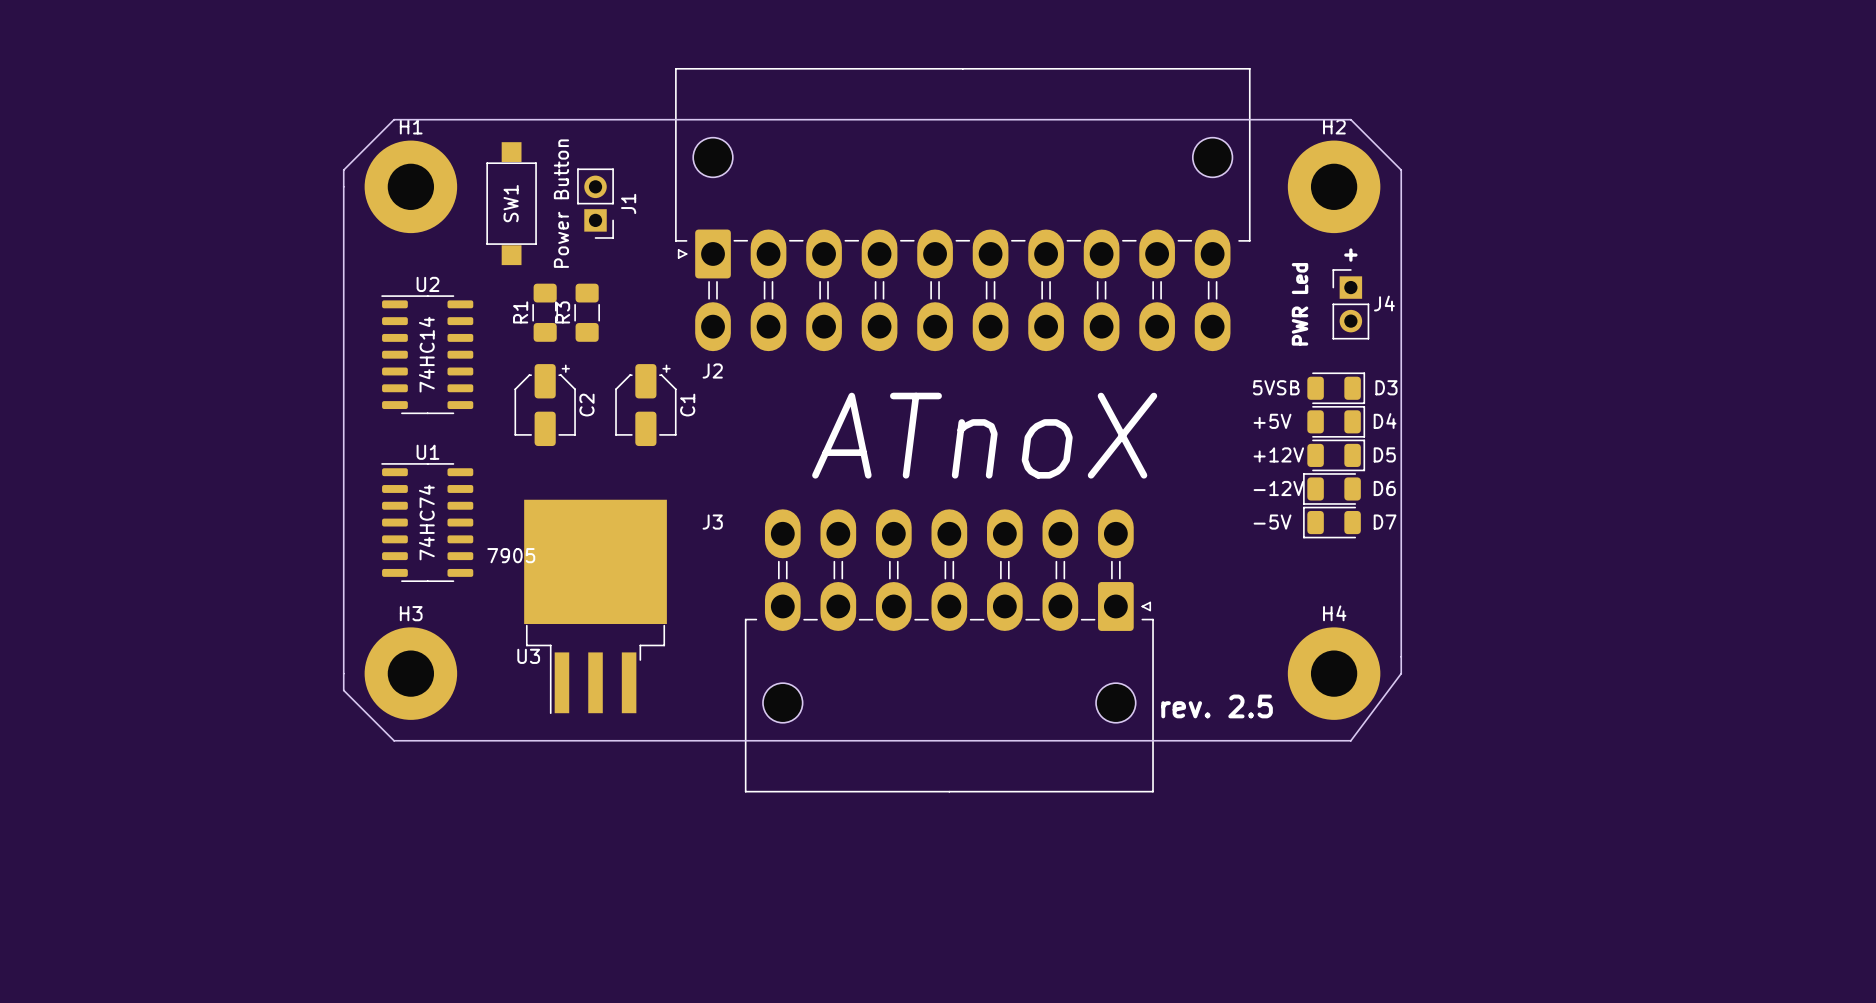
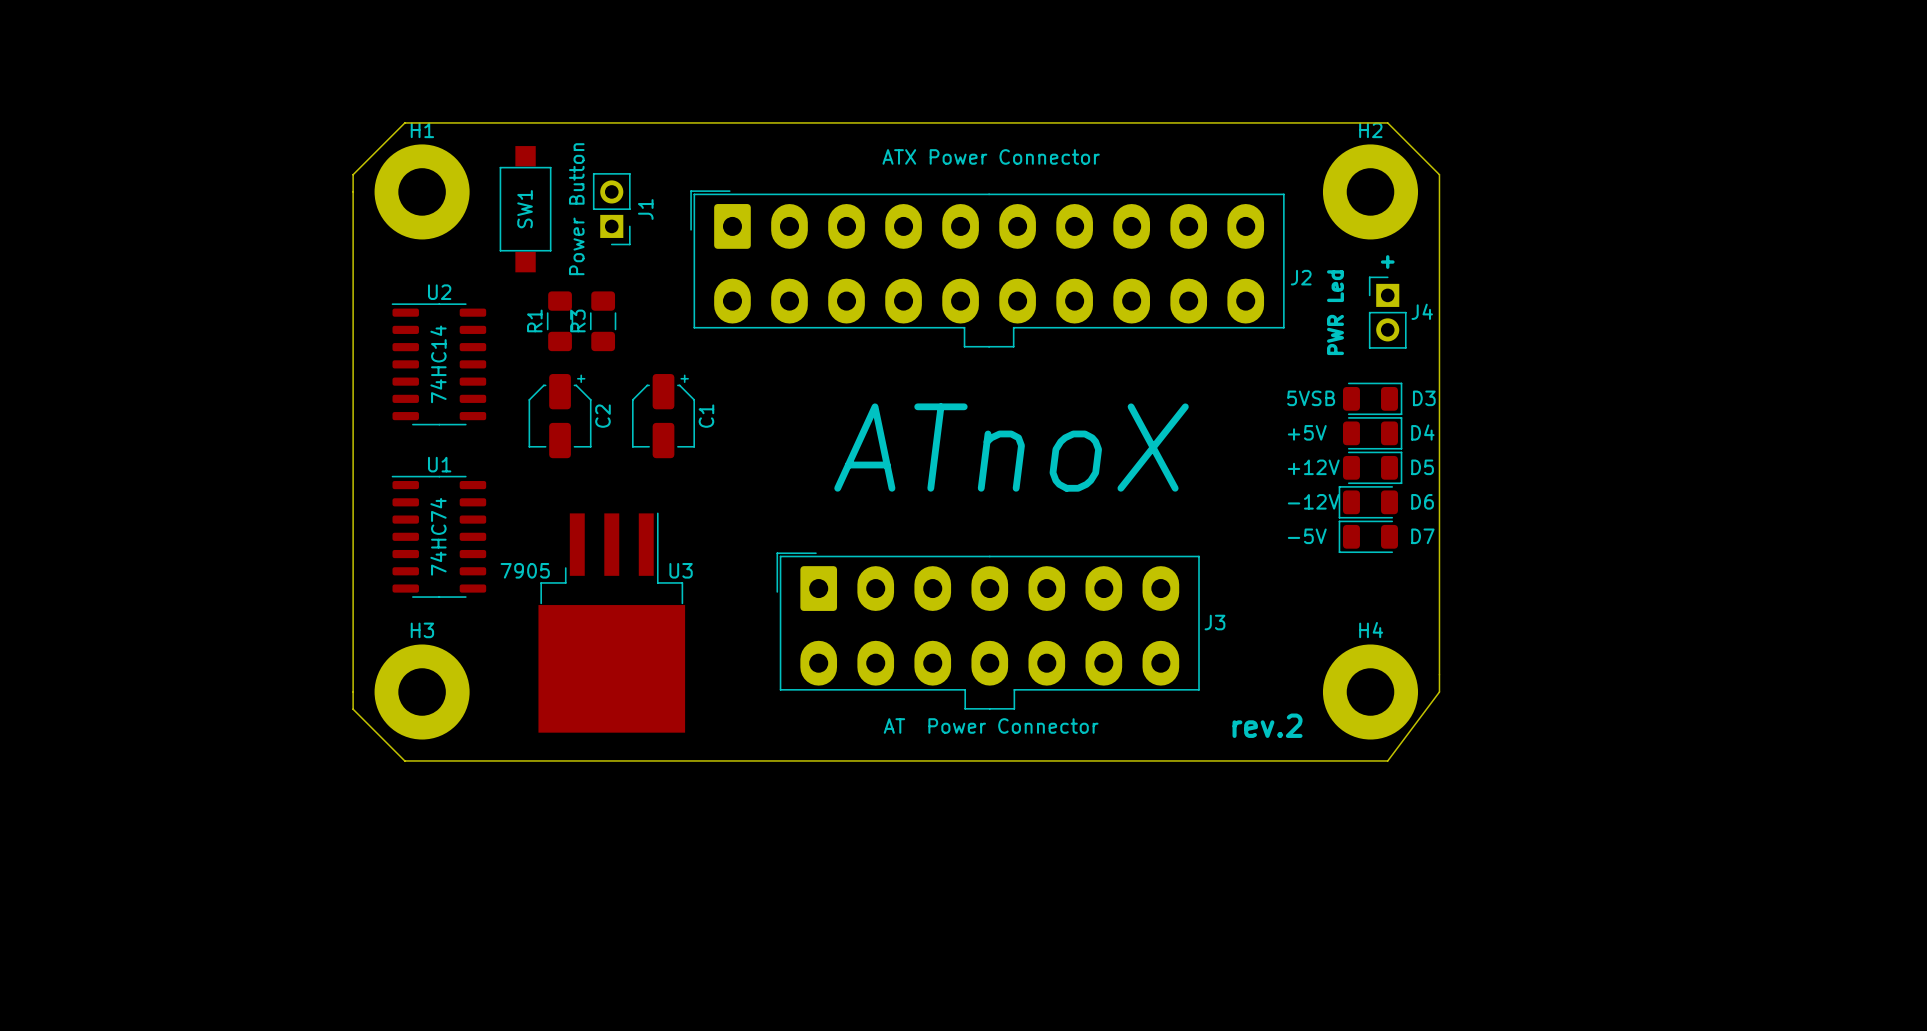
J2 footprint: [675, 68, 1251, 352] -> [690, 190, 1285, 348]
text: none -> ATX Power Connector (991, 156)
J2 name position: J2 (712, 370) -> J2 (1301, 277)
J3 footprint: [744, 509, 1154, 793] -> [776, 552, 1200, 710]
J3 name position: J3 (712, 522) -> J3 (1214, 622)
U3 rotation: 0° (595, 606) -> 180° (611, 622)
text: none -> AT Power Connector (991, 725)
text: rev. 2.5 (1217, 706) -> rev.2 (1267, 725)

